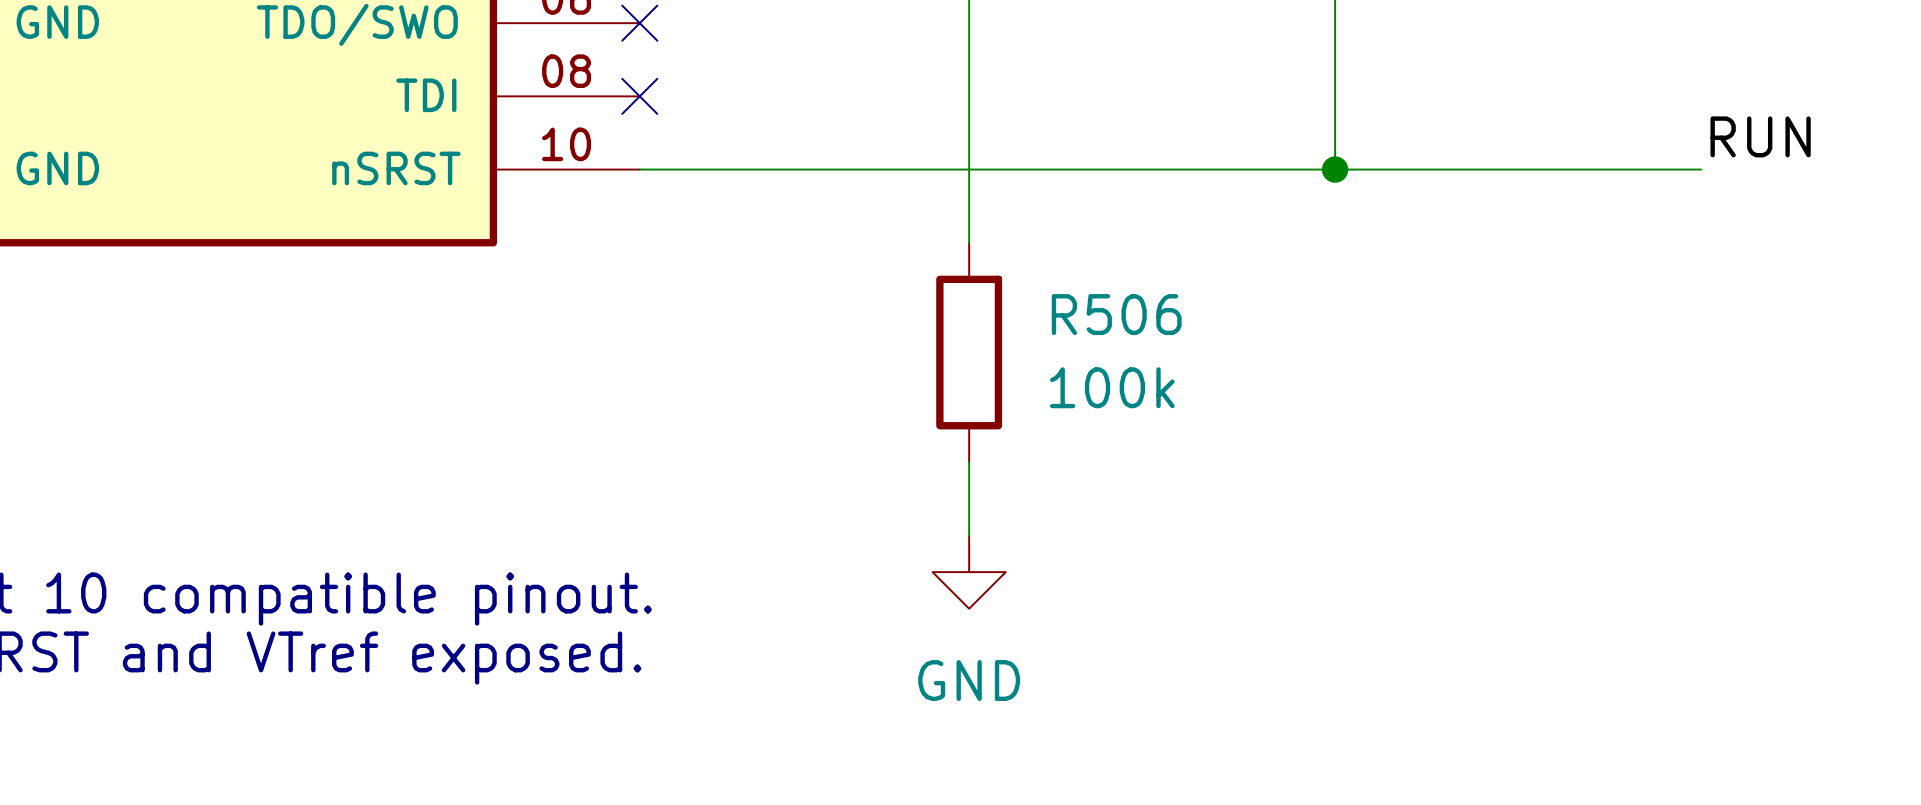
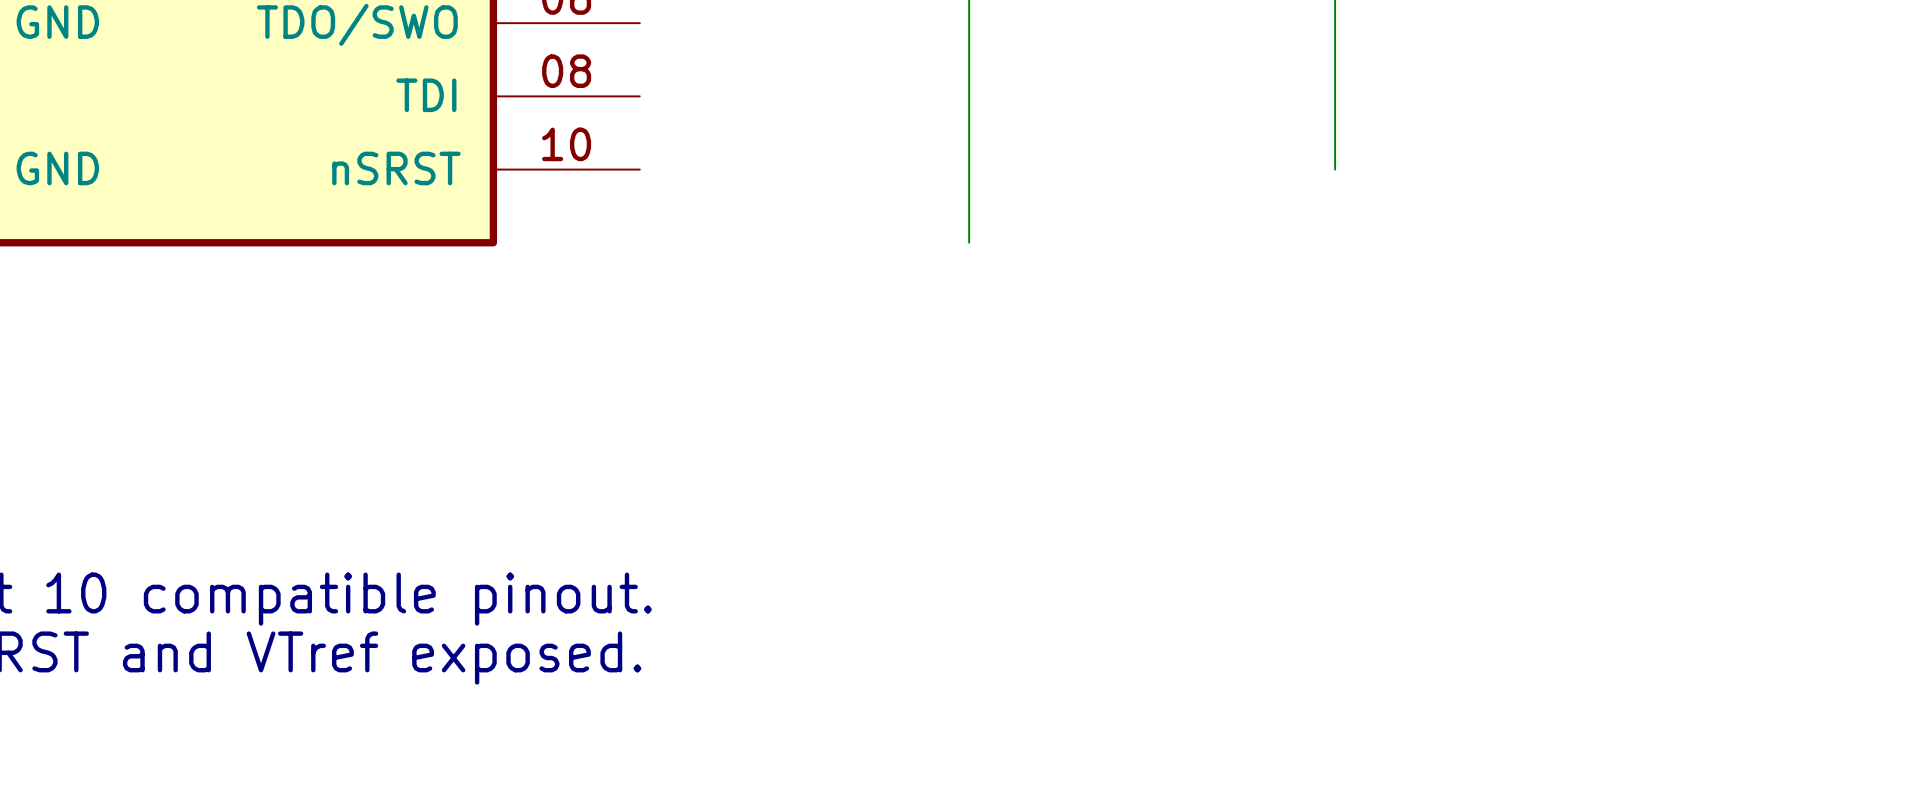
no-connect mark: (639, 23) -> none
no-connect mark: (639, 96) -> none
label: RUN (1760, 136) -> none
wire: (639, 169) (1701, 169) -> none
junction: (1335, 169) -> none
R506: 100k (969, 352) -> none
wire: (969, 462) (969, 535) -> none
power symbol: GND (969, 572) -> none

